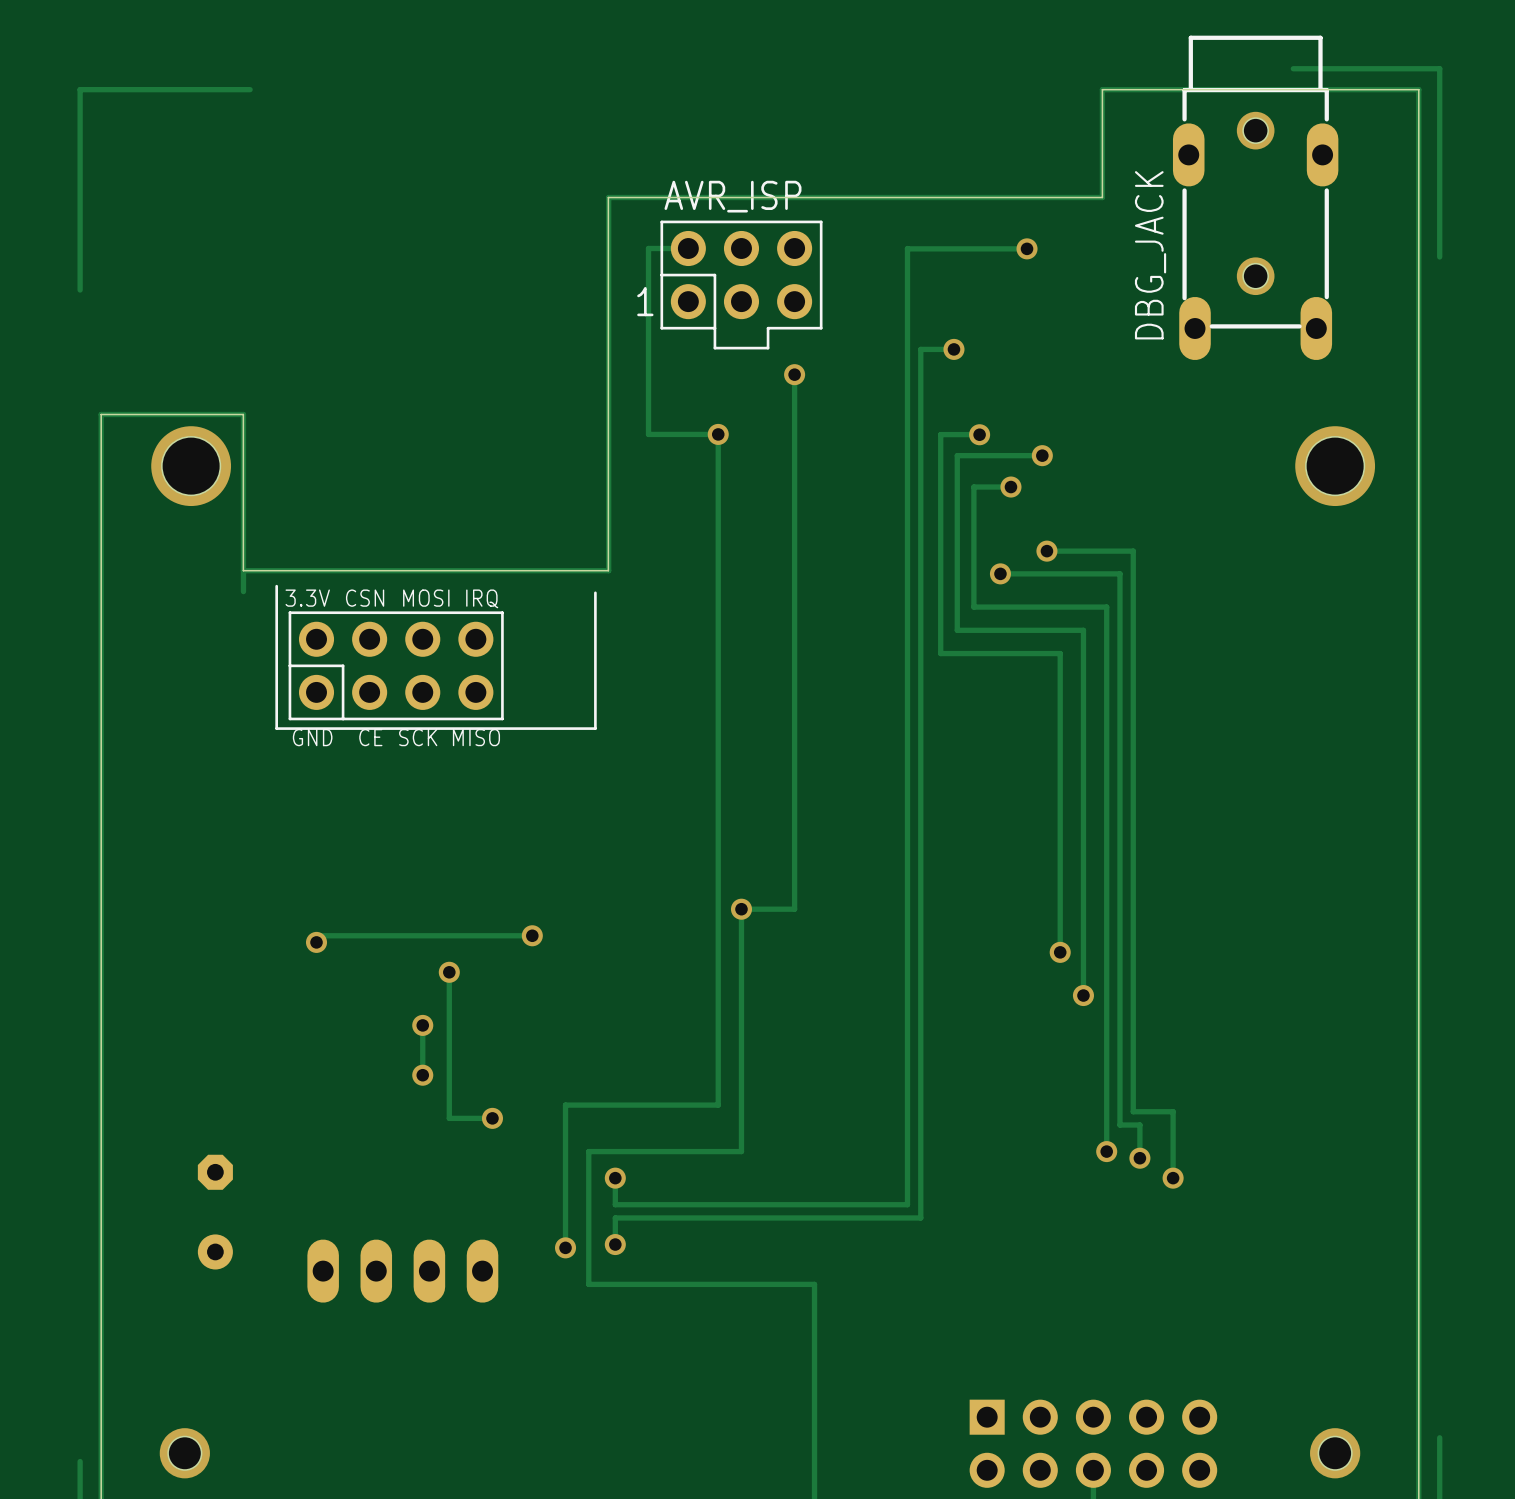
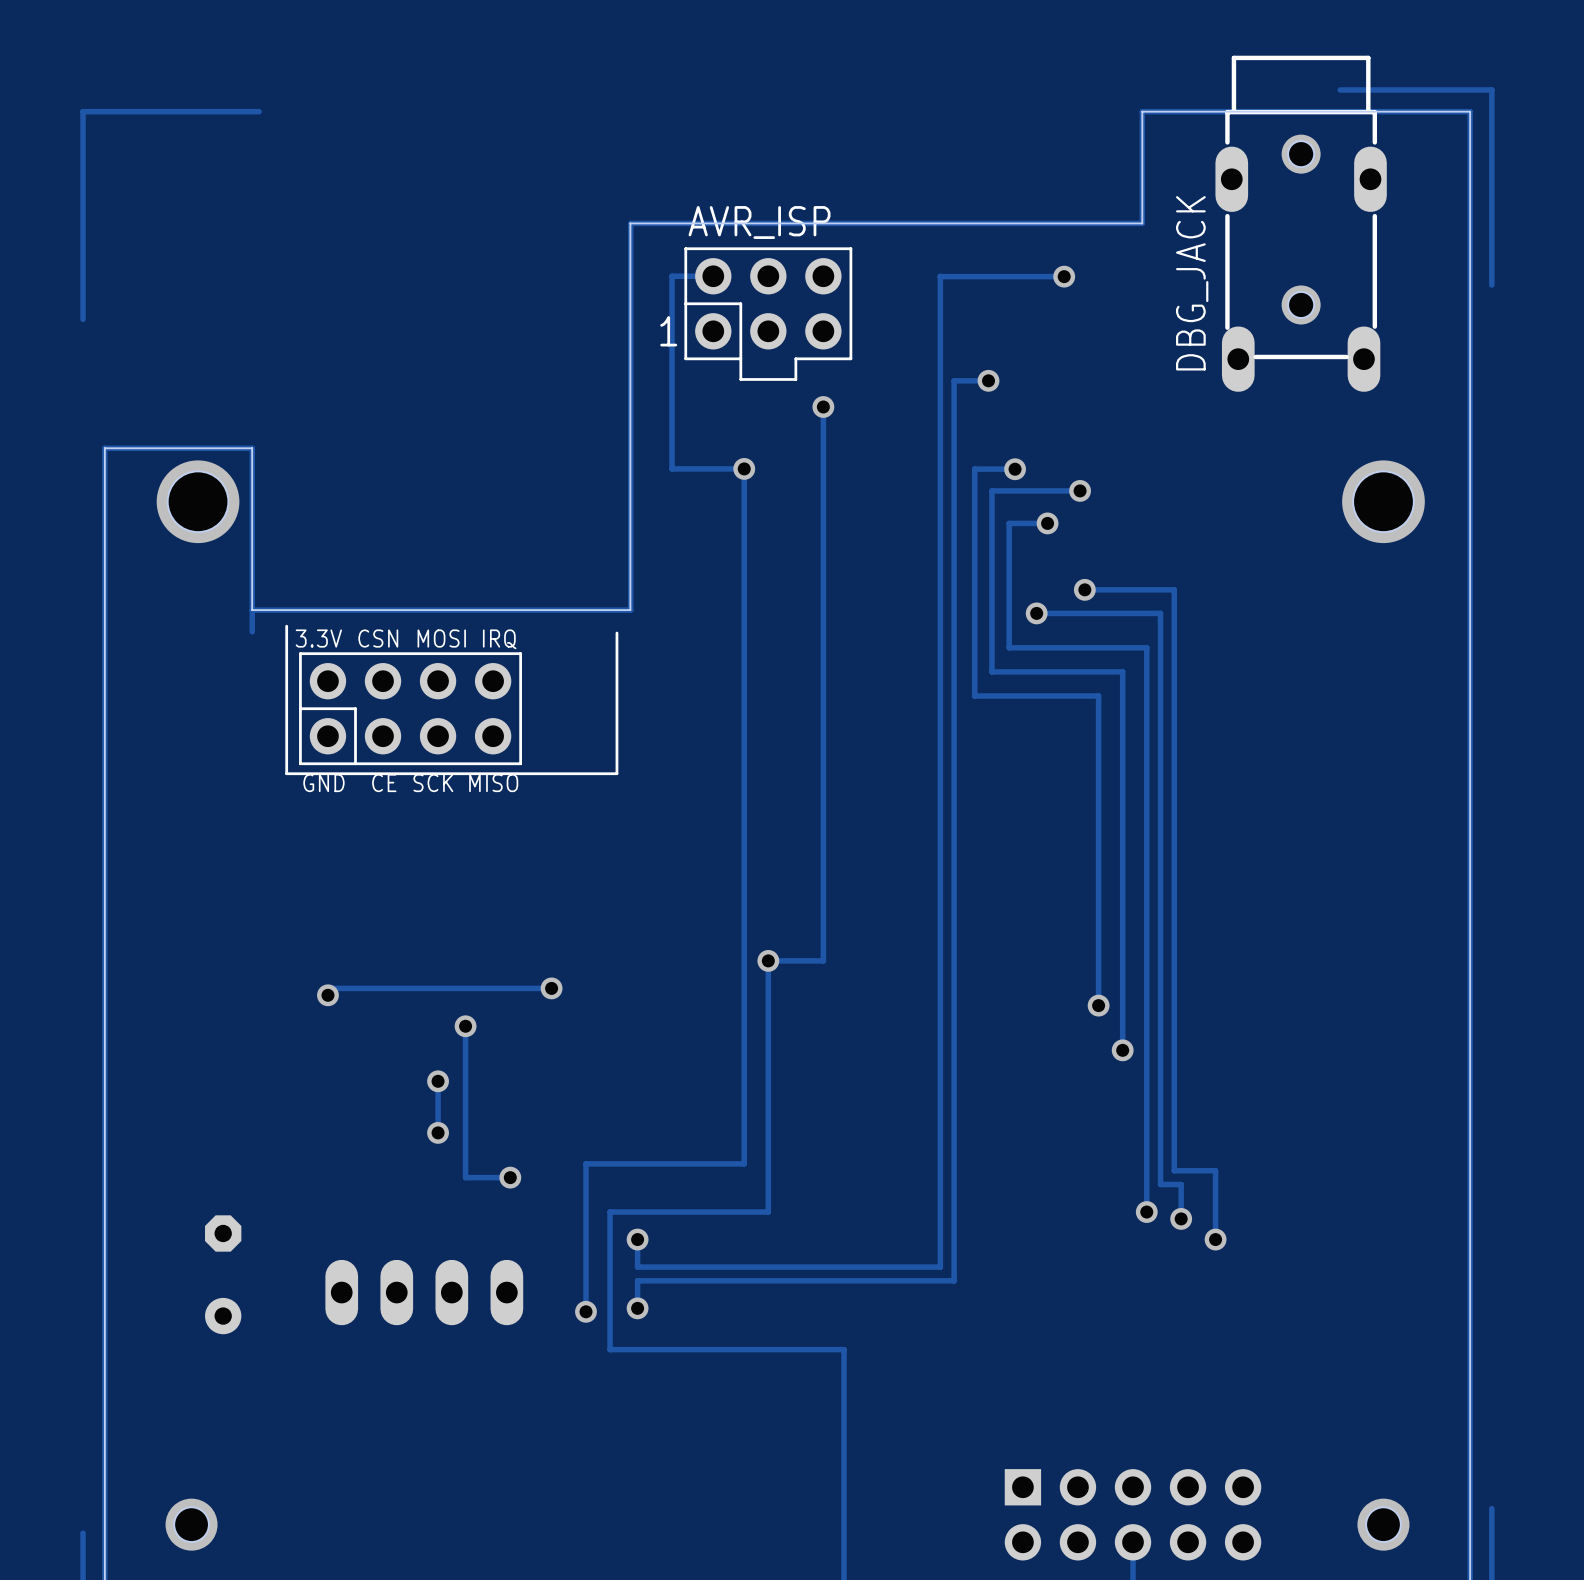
part position: (402, 1271) -> (424, 1292)

